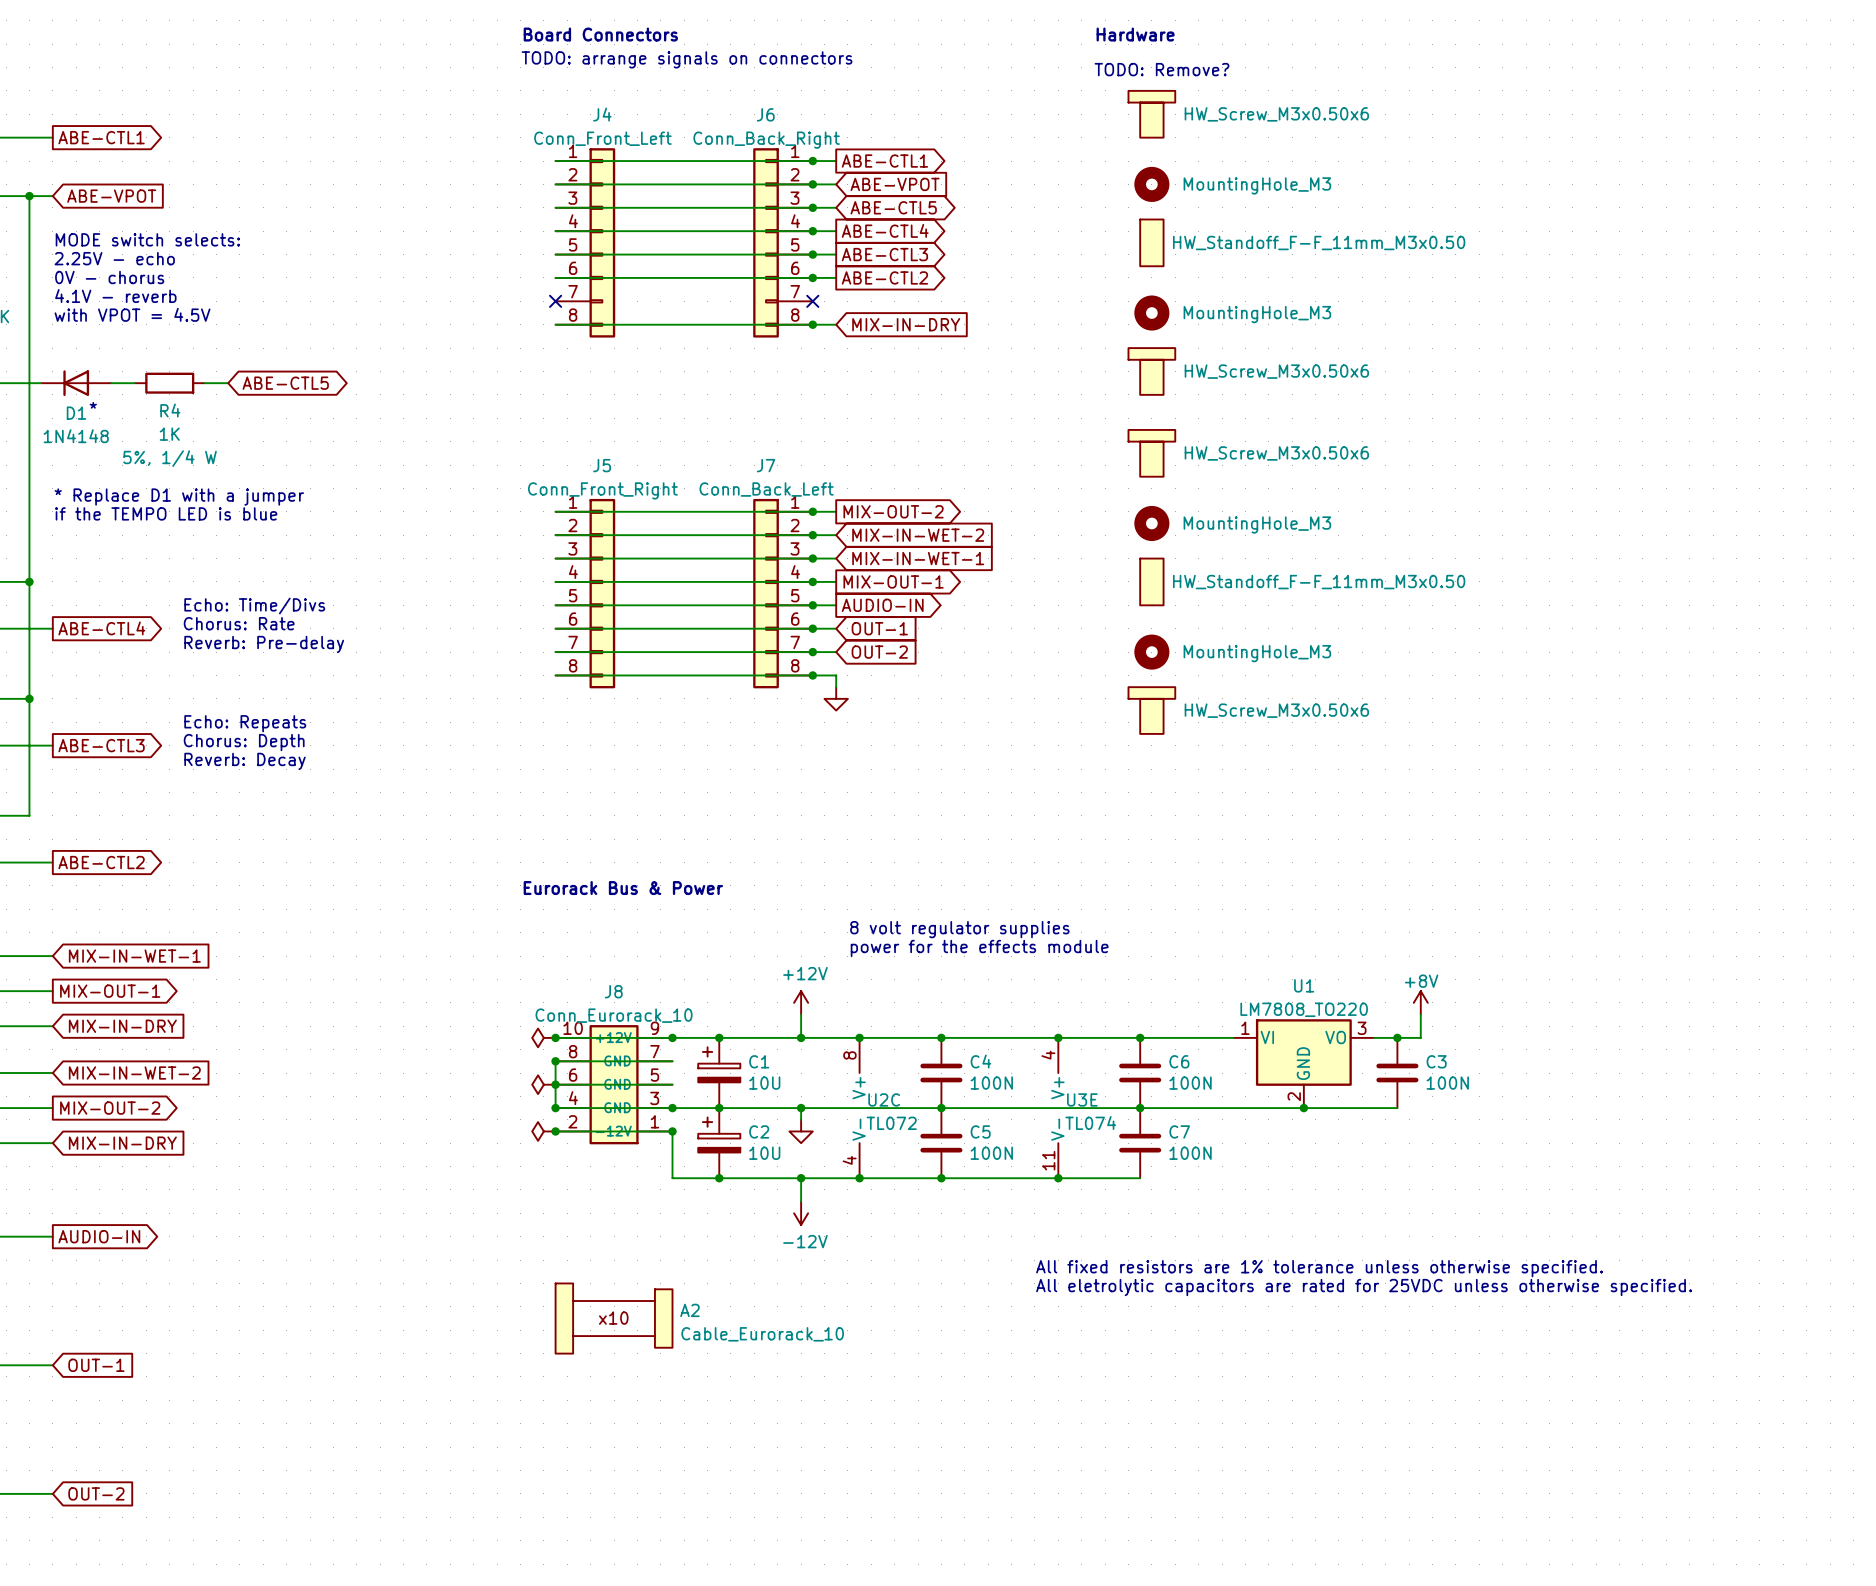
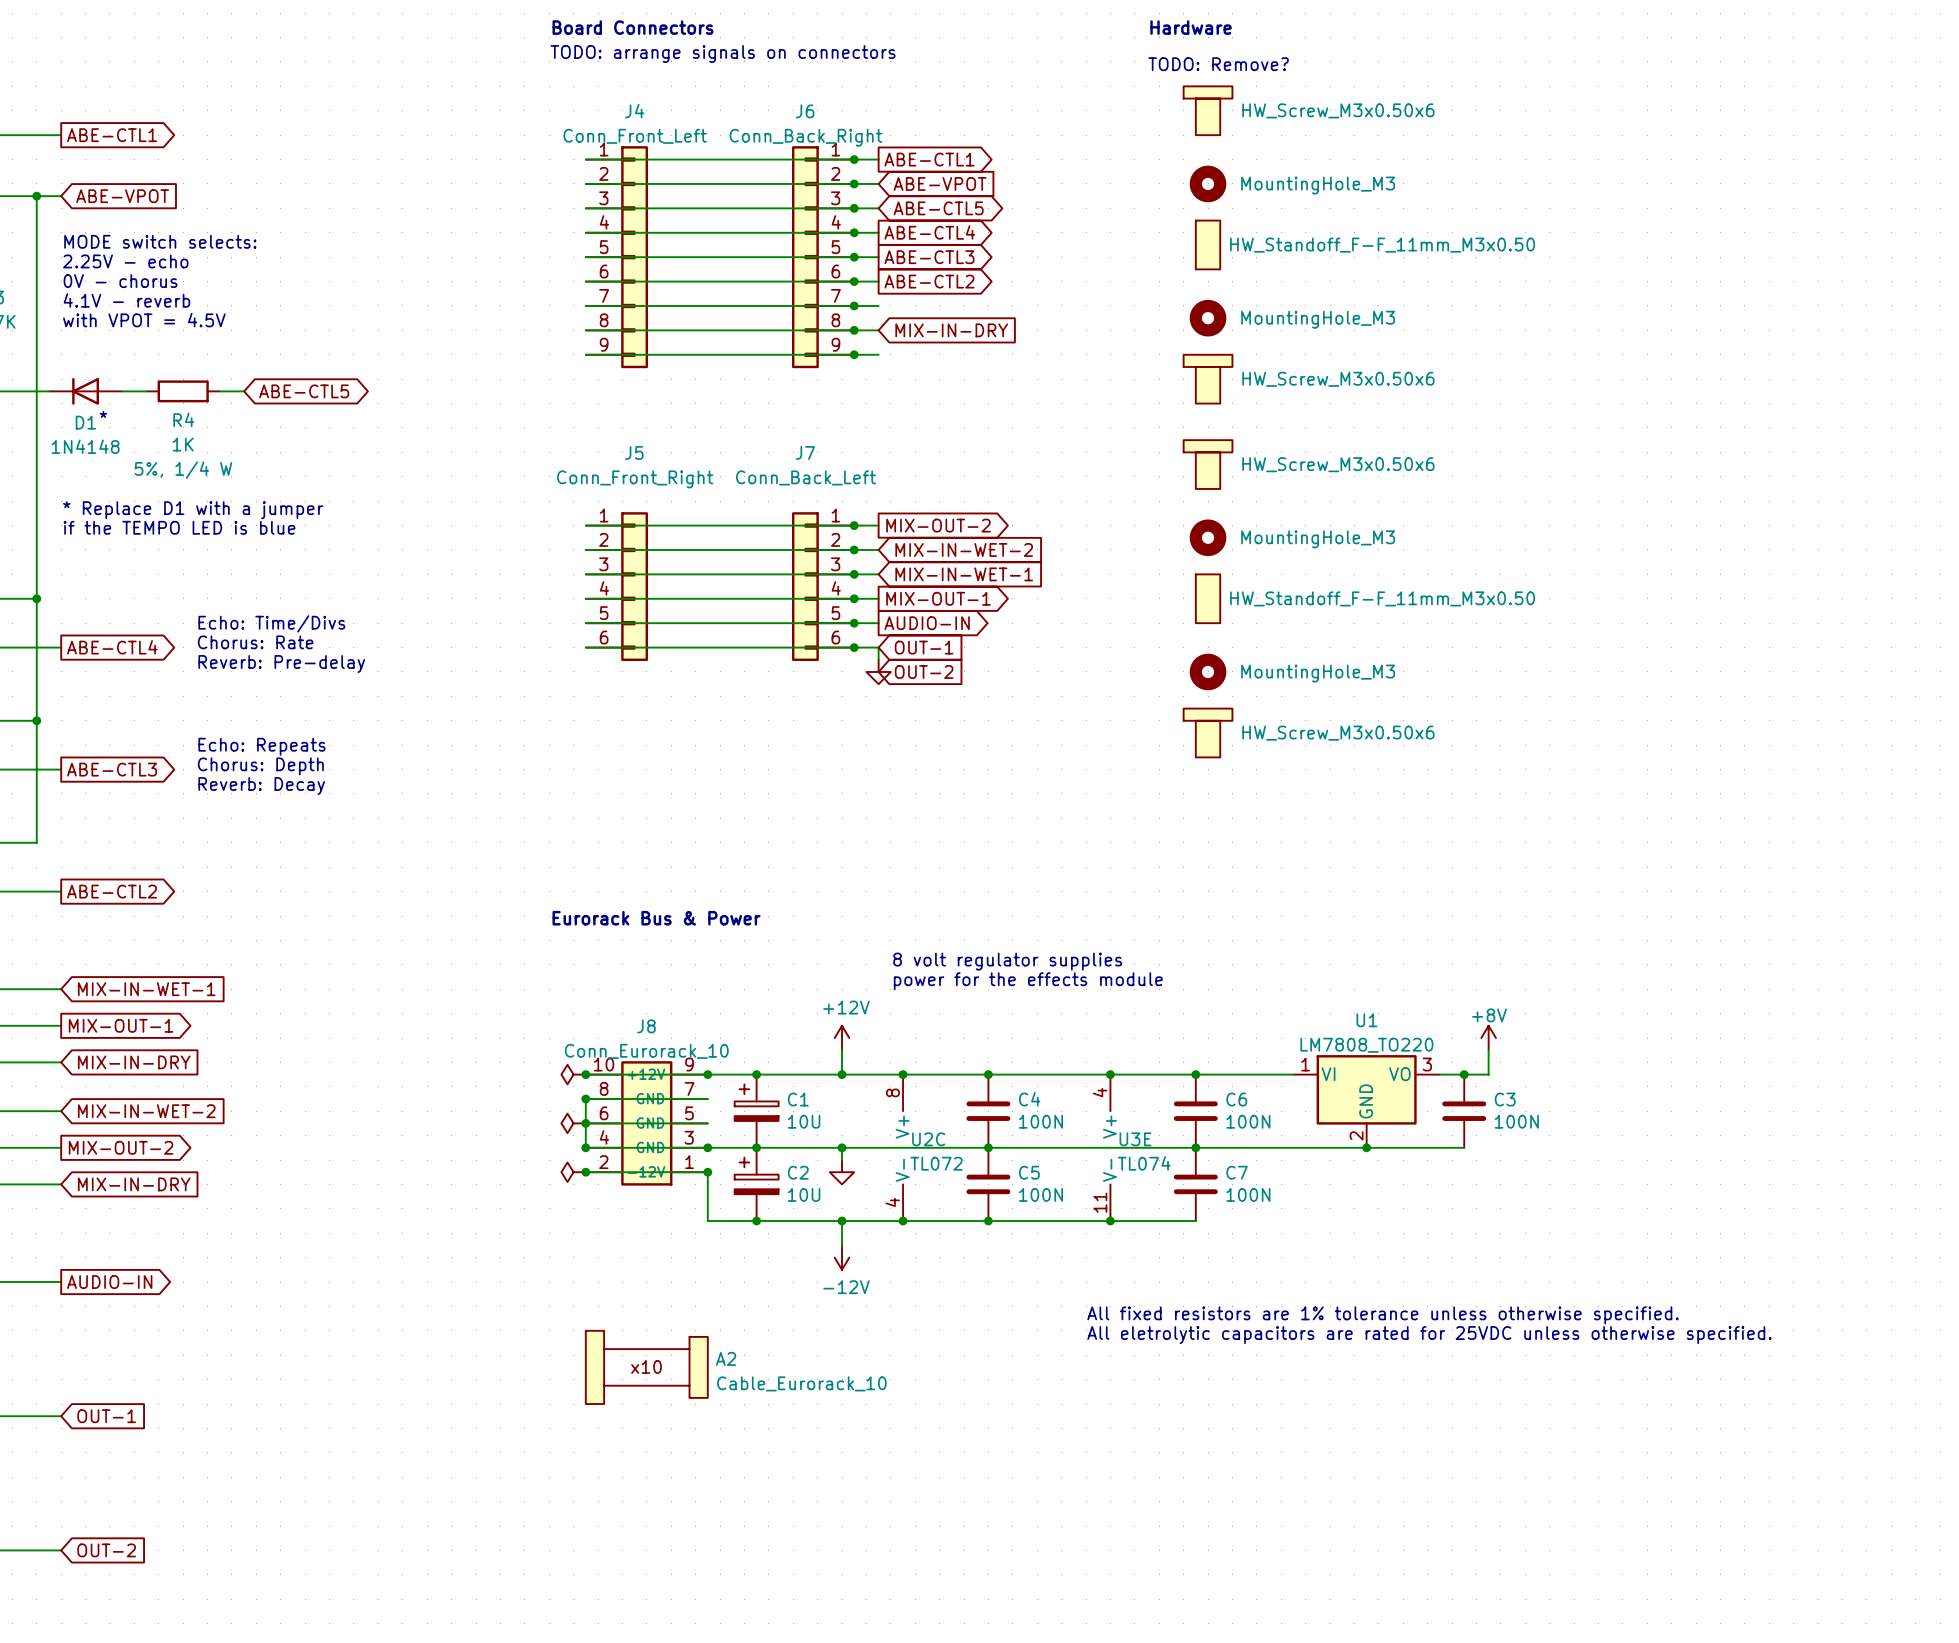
J4 symbol: [555, 148, 616, 338] -> [585, 146, 649, 369]
J6 symbol: [753, 148, 813, 338] -> [791, 146, 855, 369]
wire: none -> (585, 305) (878, 305)
no-connect mark: (555, 301) -> none
junction: none -> (854, 305)
no-connect mark: (812, 301) -> none
wire: none -> (585, 354) (878, 354)
junction: none -> (854, 354)
J5 symbol: [555, 498, 616, 689] -> [585, 512, 649, 662]
J7 symbol: [753, 498, 813, 689] -> [791, 512, 855, 662]
wire: none -> (878, 647) (878, 659)
wire: (555, 652) (836, 652) -> none
junction: (812, 652) -> none
wire: (555, 675) (836, 675) (836, 687) -> none
junction: (812, 675) -> none
power symbol position: (836, 698) -> (878, 671)

